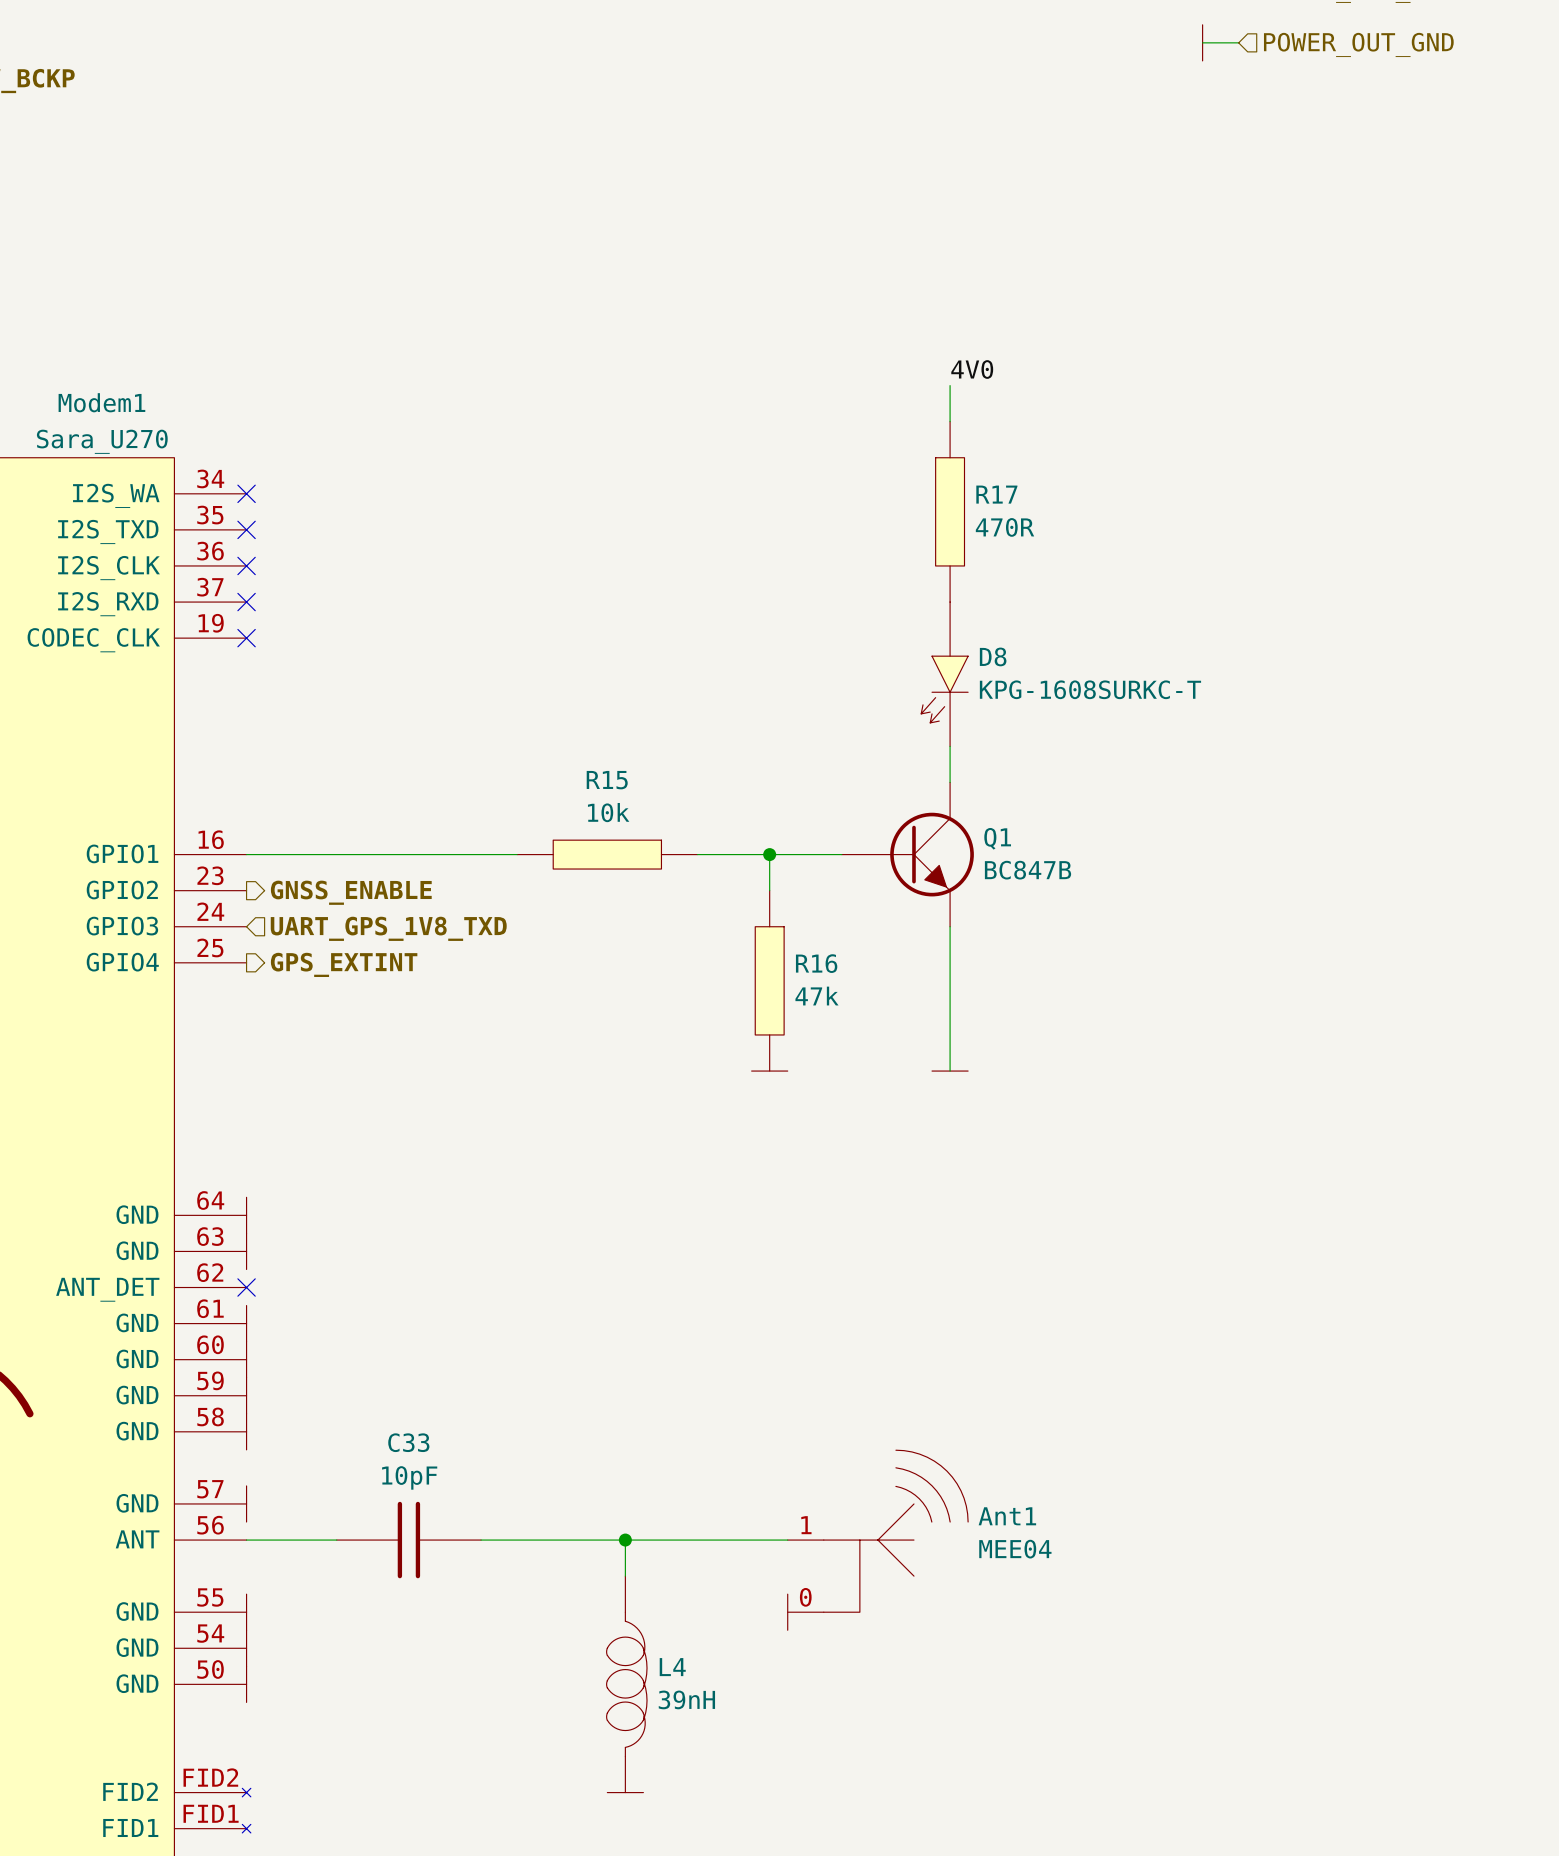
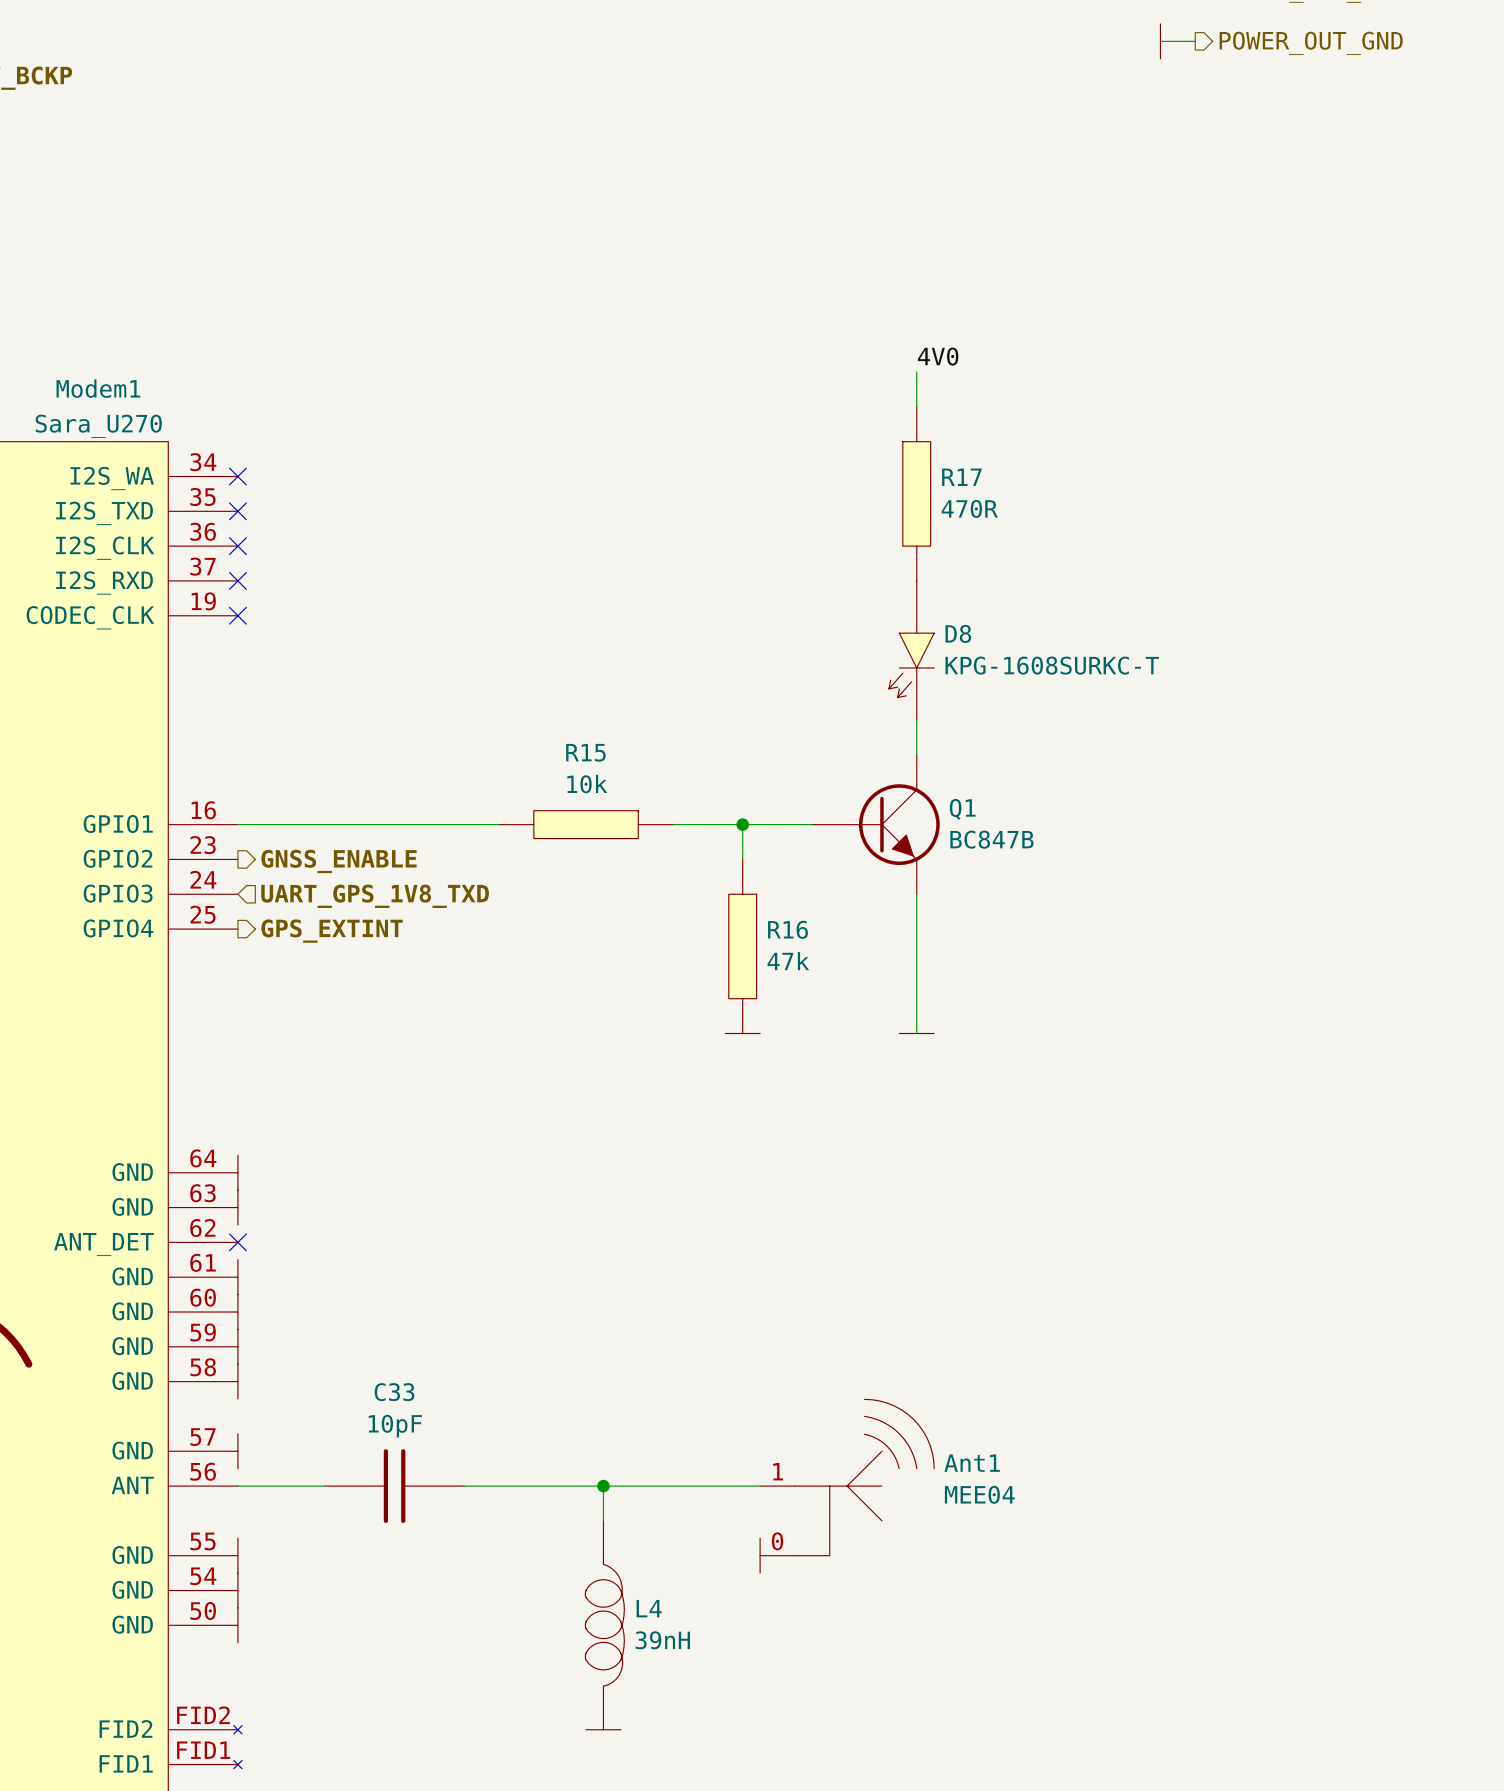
hierarchical label shape: input (1358, 44) -> output (1311, 43)

